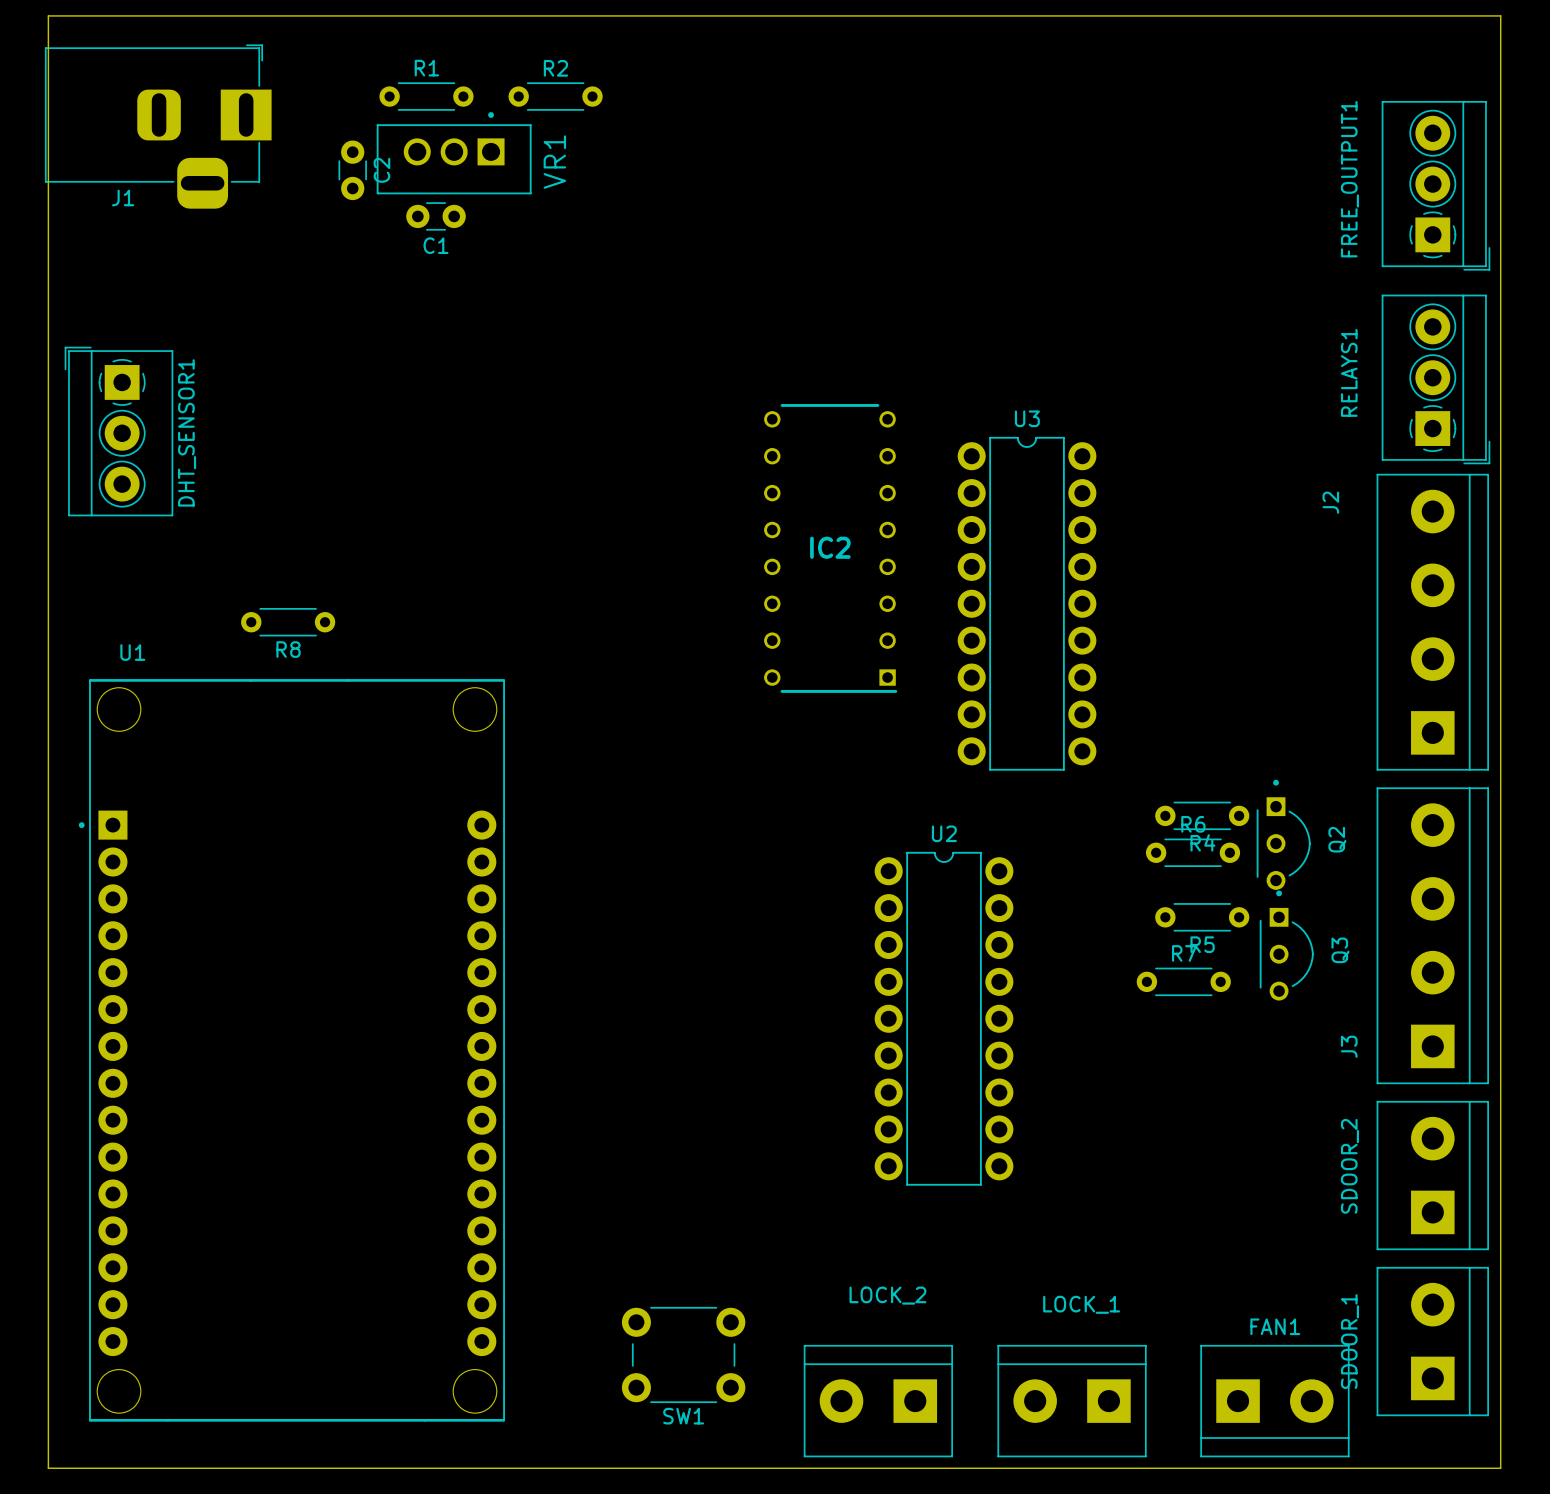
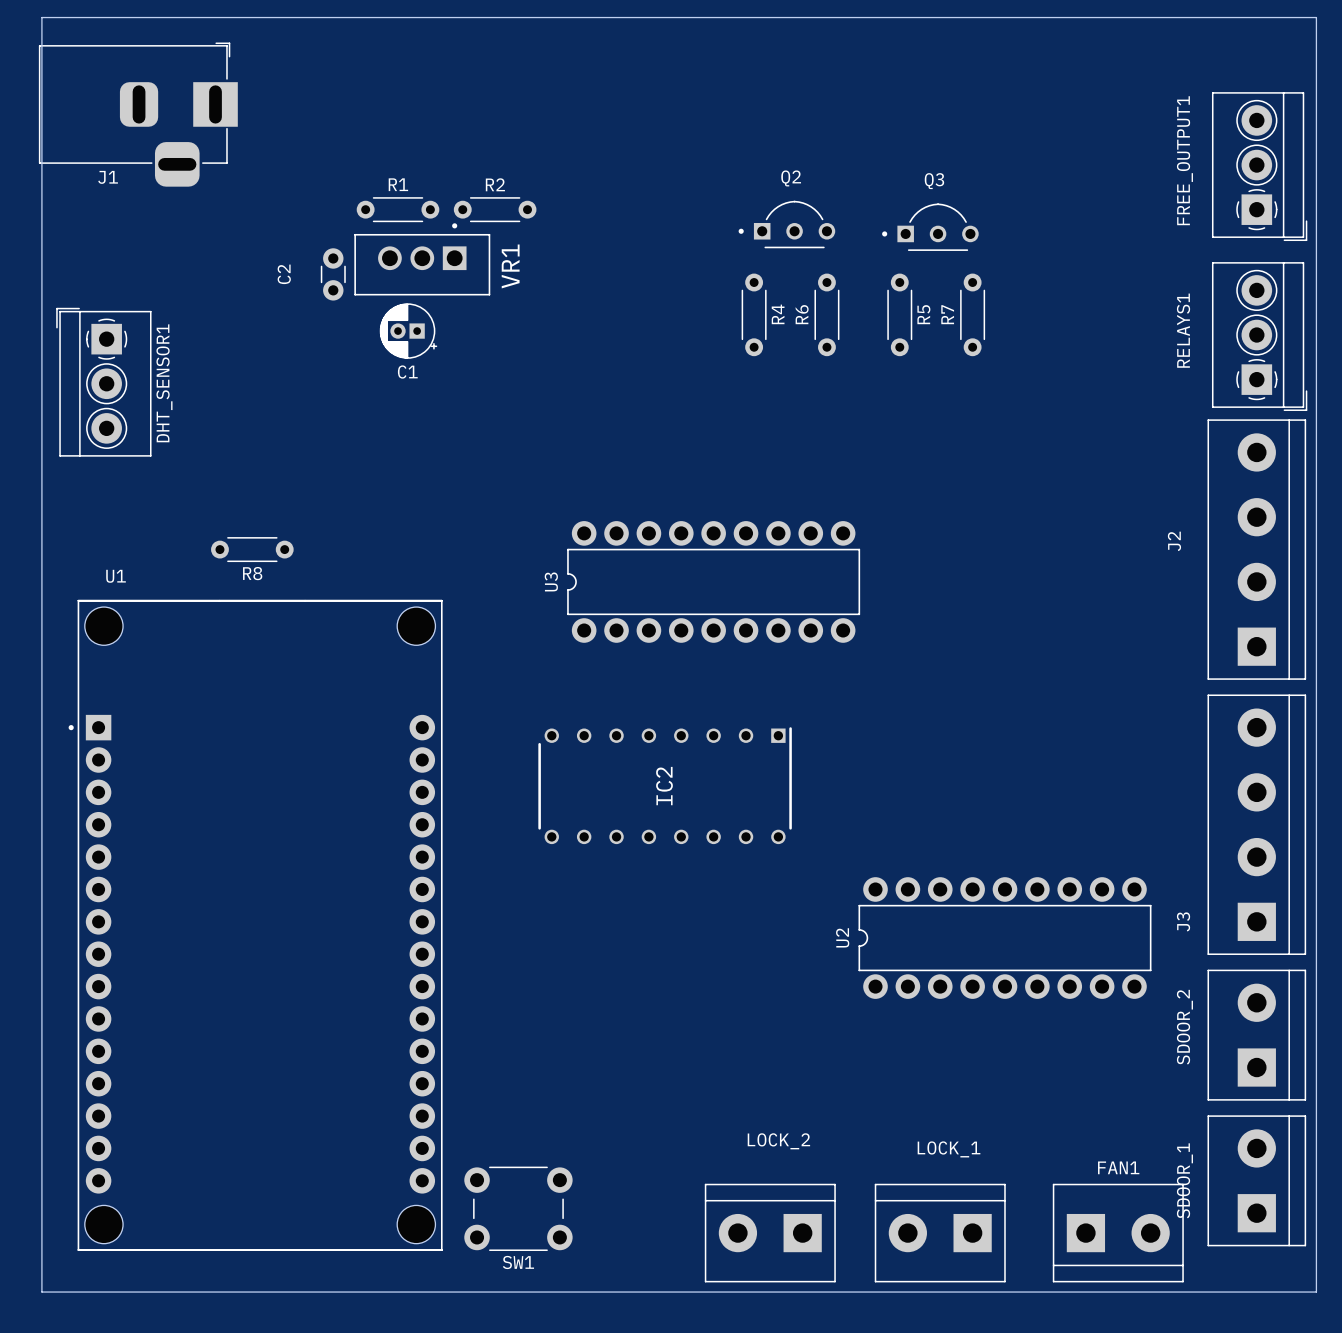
R1 position: (426, 96) -> (398, 209)
R2 position: (555, 96) -> (495, 209)
VR1 position: (454, 153) -> (422, 259)
C2 position: (352, 170) -> (333, 274)
C2 name position: C2 (381, 170) -> C2 (284, 274)
C1 footprint: [406, 202, 466, 231] -> [379, 303, 438, 359]
J2 name position: J2 (1330, 502) -> J2 (1174, 541)
IC2 rotation: 0° (830, 548) -> 90° counterclockwise (665, 785)
IC2 position: (830, 548) -> (665, 785)
U3 rotation: 0° (1027, 603) -> 90° counterclockwise (713, 581)
U3 position: (1027, 603) -> (713, 581)
R4 rotation: 0° (1202, 815) -> 90° clockwise (754, 314)
R4 position: (1202, 815) -> (754, 314)
R6 name position: R6 (1193, 824) -> R6 (802, 314)
Q2 rotation: 0° (1283, 834) -> 90° counterclockwise (786, 224)
Q2 position: (1283, 834) -> (786, 224)
R4 name position: R4 (1202, 842) -> R4 (778, 314)
R6 rotation: 0° (1193, 852) -> 90° clockwise (826, 314)
R6 position: (1193, 852) -> (826, 314)
R5 rotation: 0° (1202, 917) -> 90° clockwise (899, 314)
R5 position: (1202, 917) -> (899, 314)
R5 name position: R5 (1202, 944) -> R5 (923, 314)
Q3 rotation: 0° (1286, 945) -> 90° counterclockwise (930, 227)
Q3 position: (1286, 945) -> (930, 227)
R7 name position: R7 (1184, 953) -> R7 (947, 314)
R7 rotation: 0° (1183, 981) -> 90° clockwise (972, 314)
R7 position: (1183, 981) -> (972, 314)
U2 rotation: 0° (944, 1018) -> 90° counterclockwise (1004, 938)
U2 position: (944, 1018) -> (1004, 938)
SW1 position: (683, 1354) -> (518, 1208)

